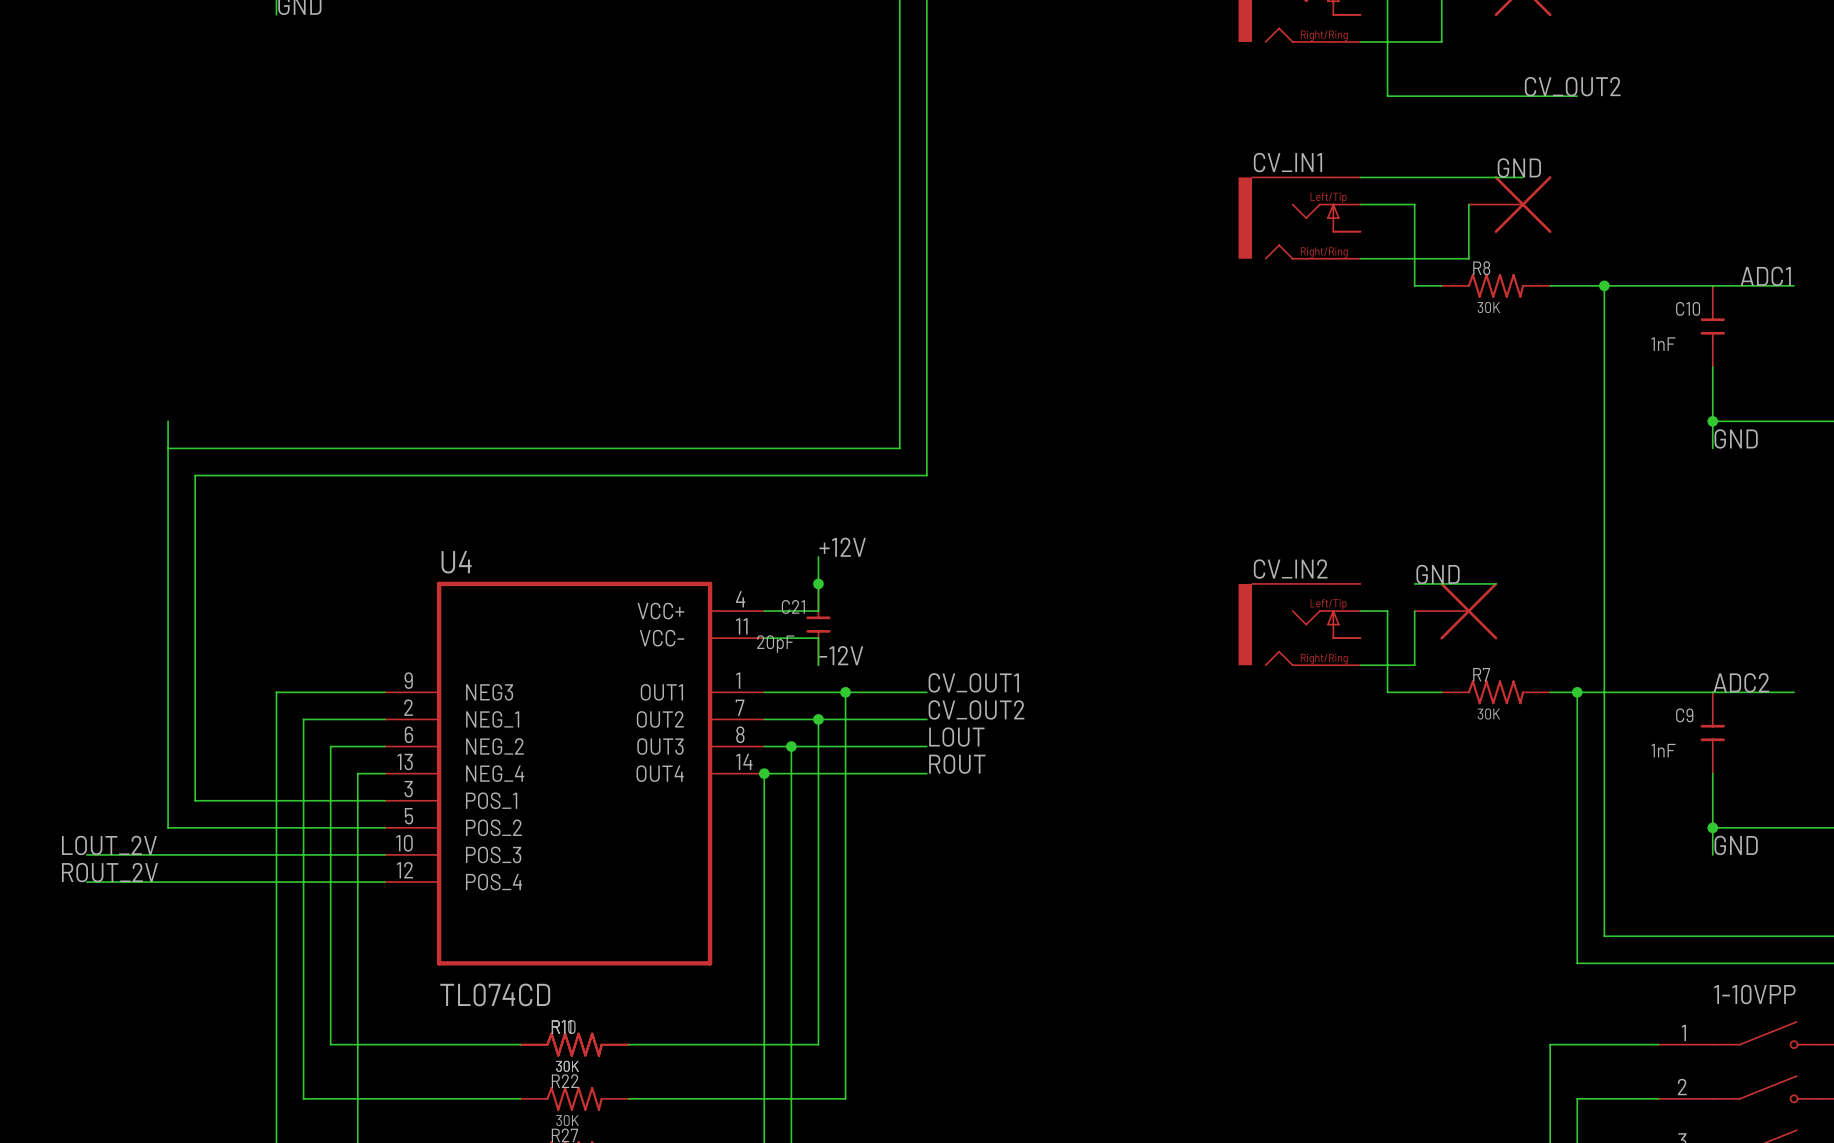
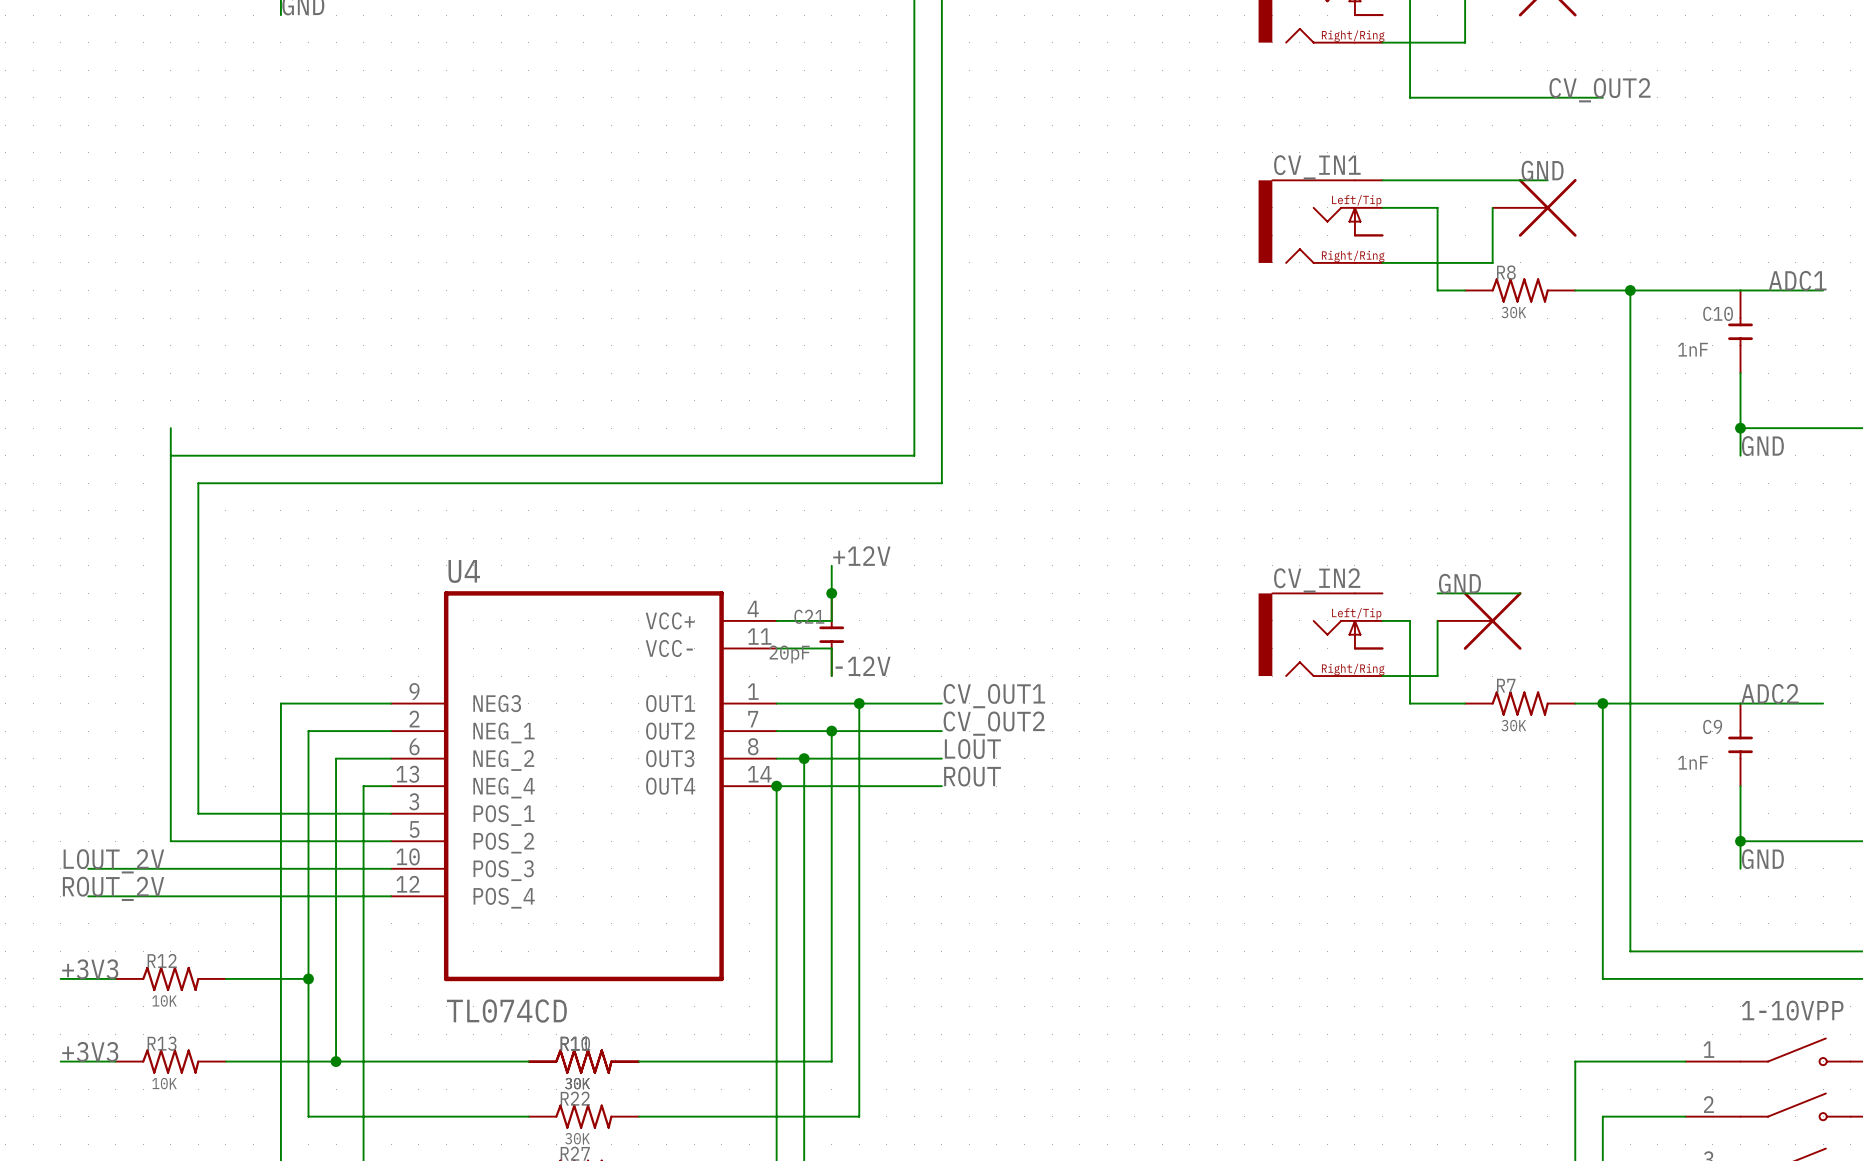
label: none -> +3V3 (90, 969)
wire: none -> (60, 978) (115, 978)
R12: none -> 10K (170, 978)
wire: none -> (225, 978) (308, 978)
junction: none -> (308, 978)
label: none -> +3V3 (90, 1051)
wire: none -> (60, 1061) (115, 1061)
R13: none -> 10K (170, 1061)
wire: none -> (225, 1061) (336, 1061)
junction: none -> (336, 1061)

